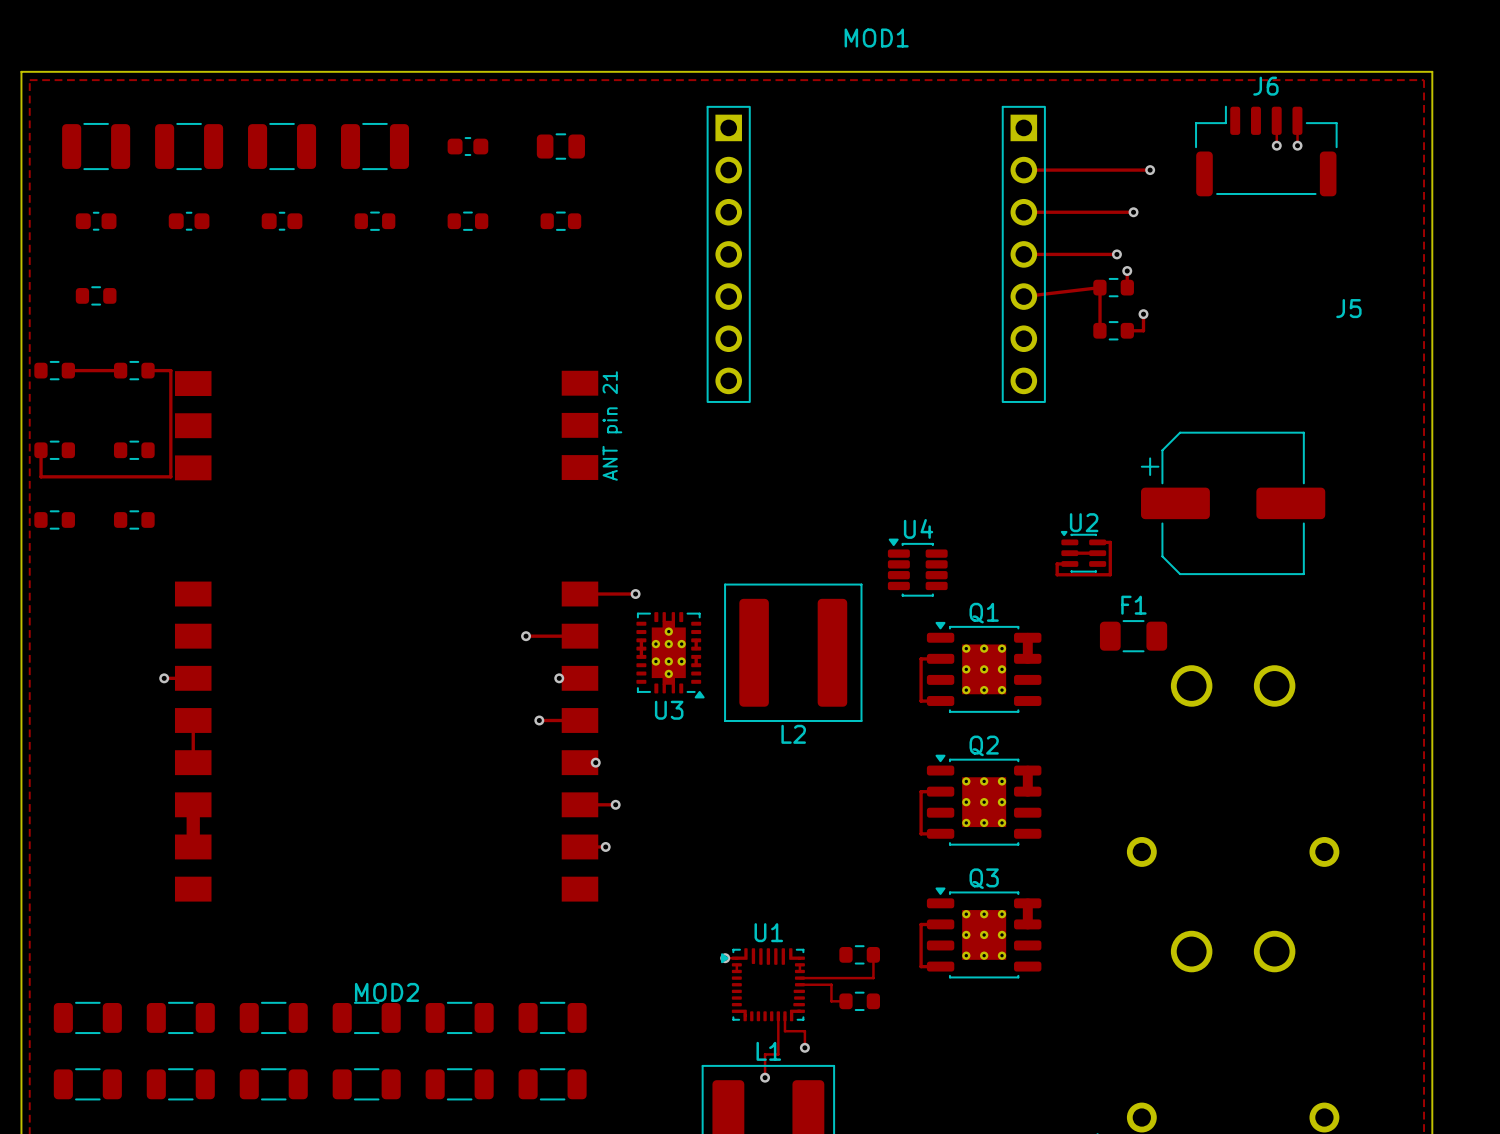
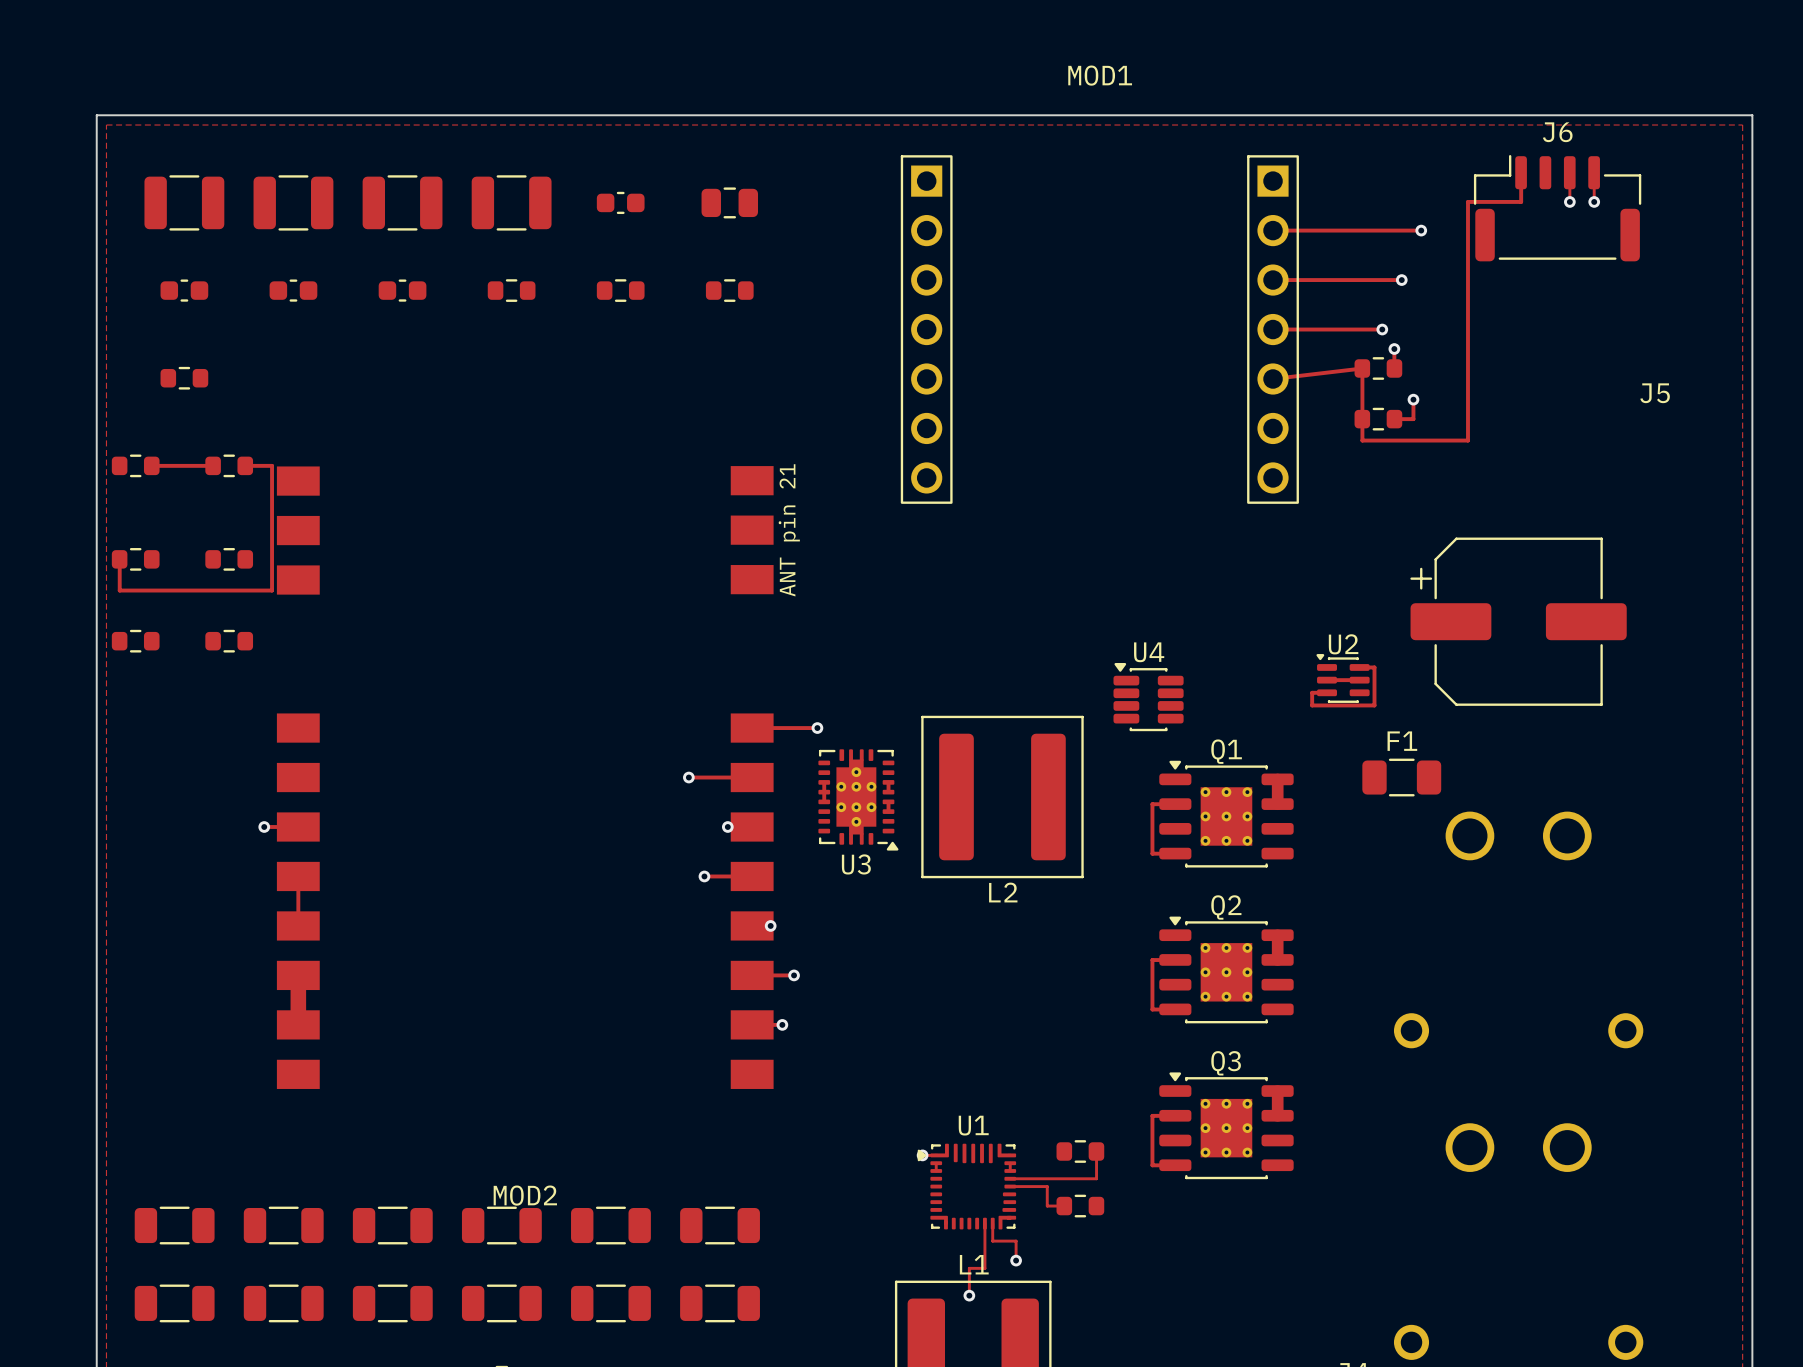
track: none -> (1521, 172) (1521, 201) (1467, 201) (1467, 440) (1362, 440) (1362, 419)

